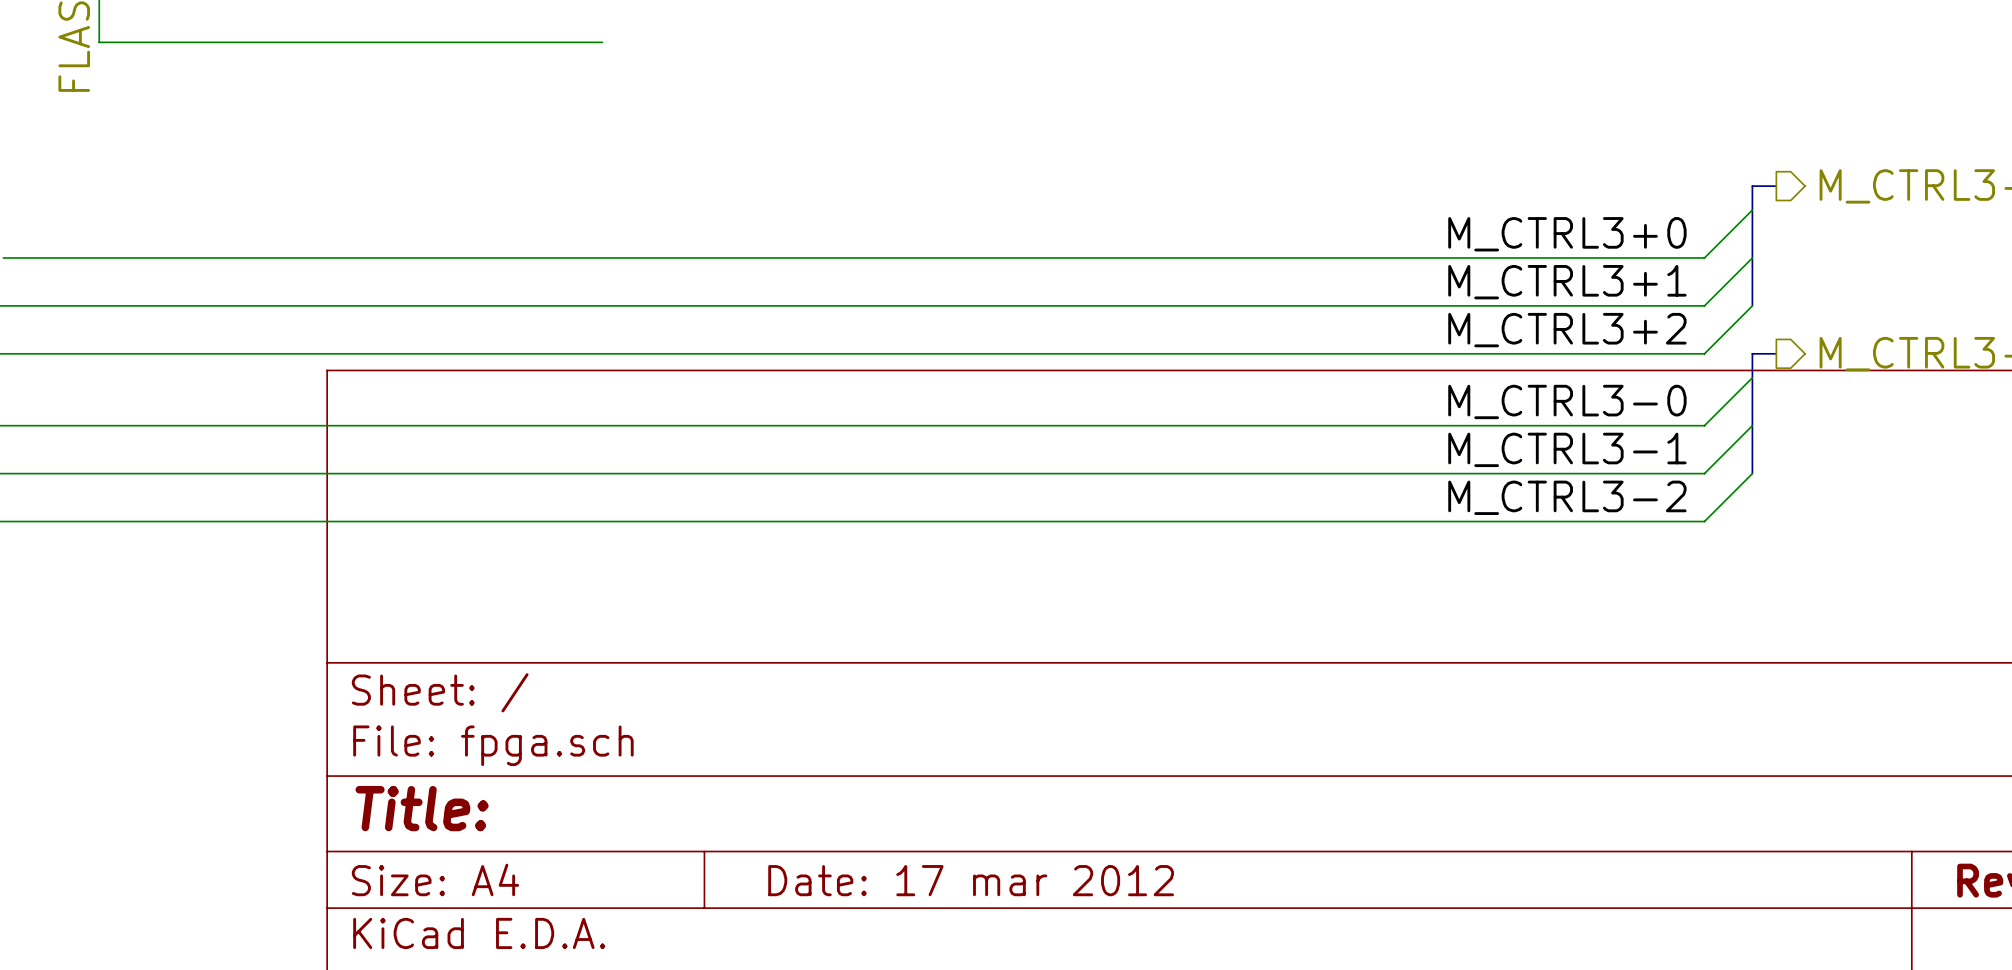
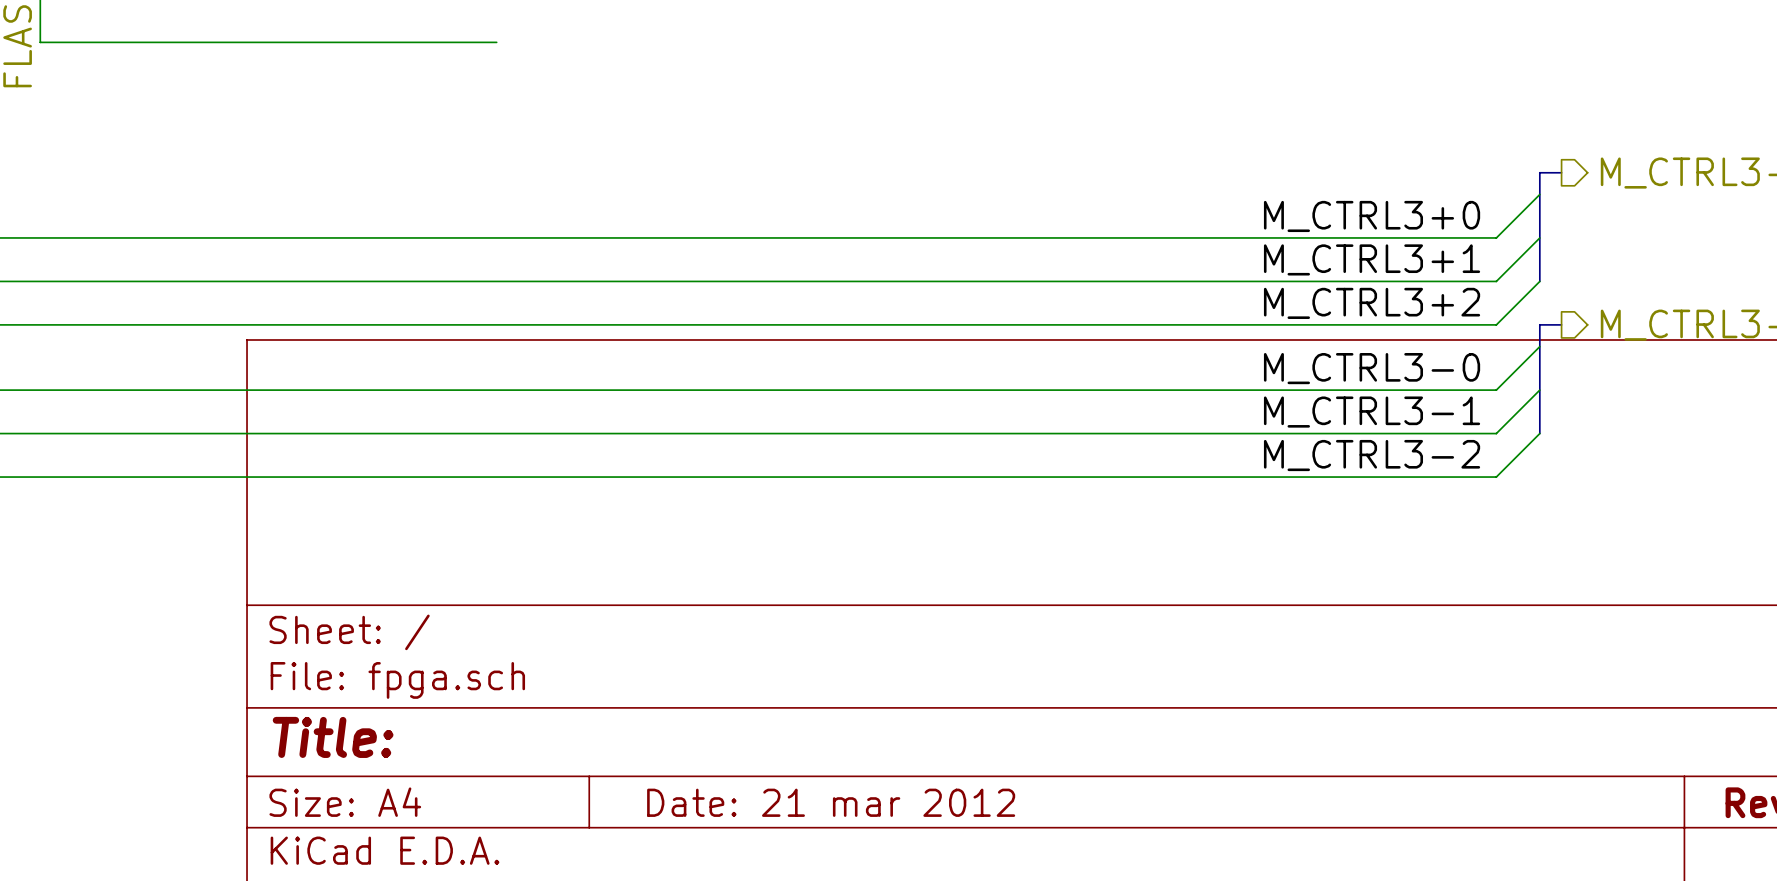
title block: Date: 17 mar 2012 (971, 880) -> Date: 21 mar 2012 (831, 802)

